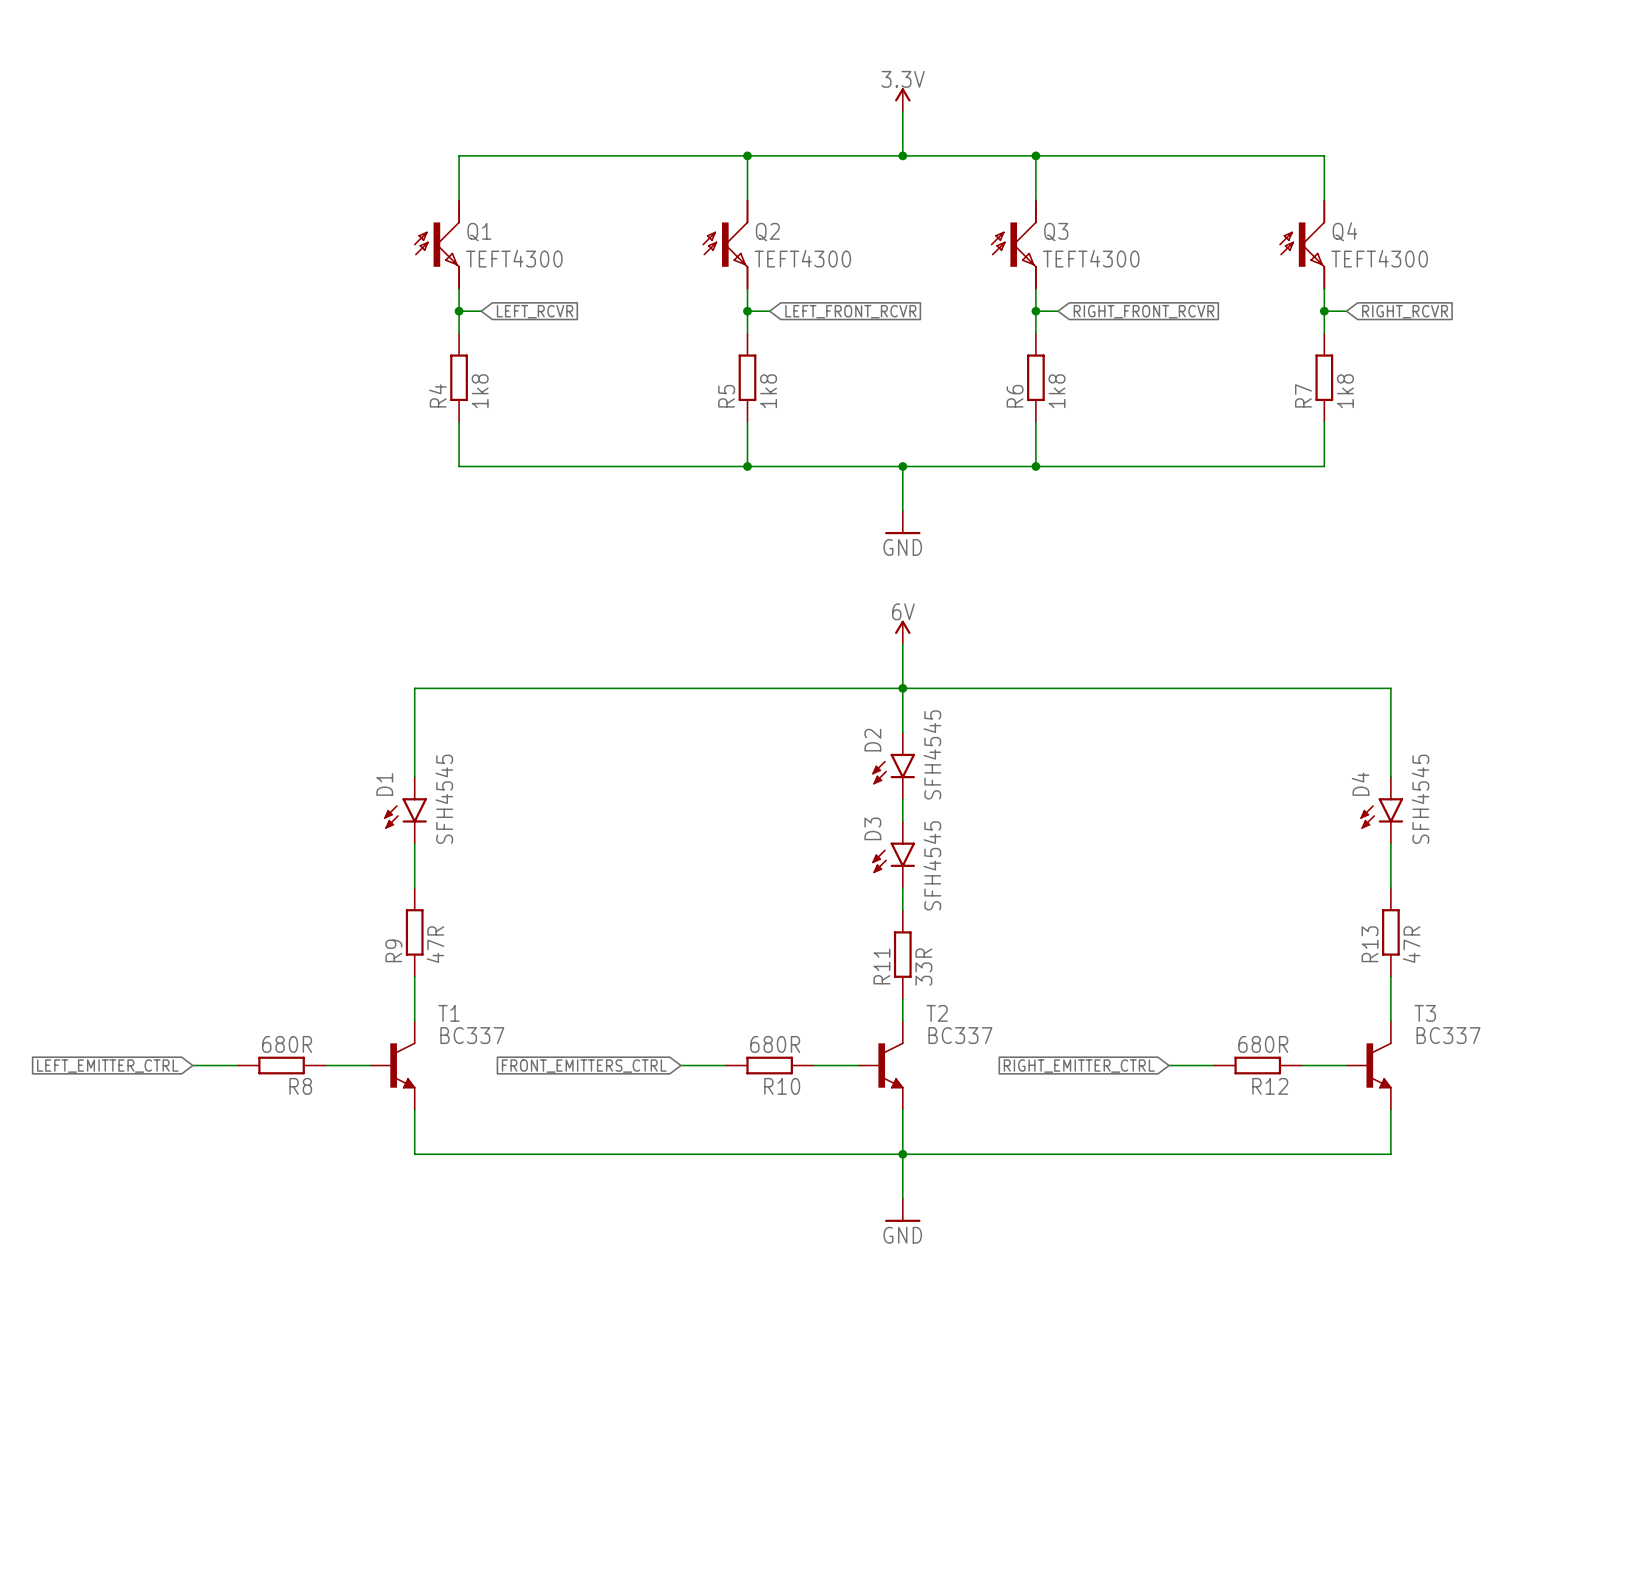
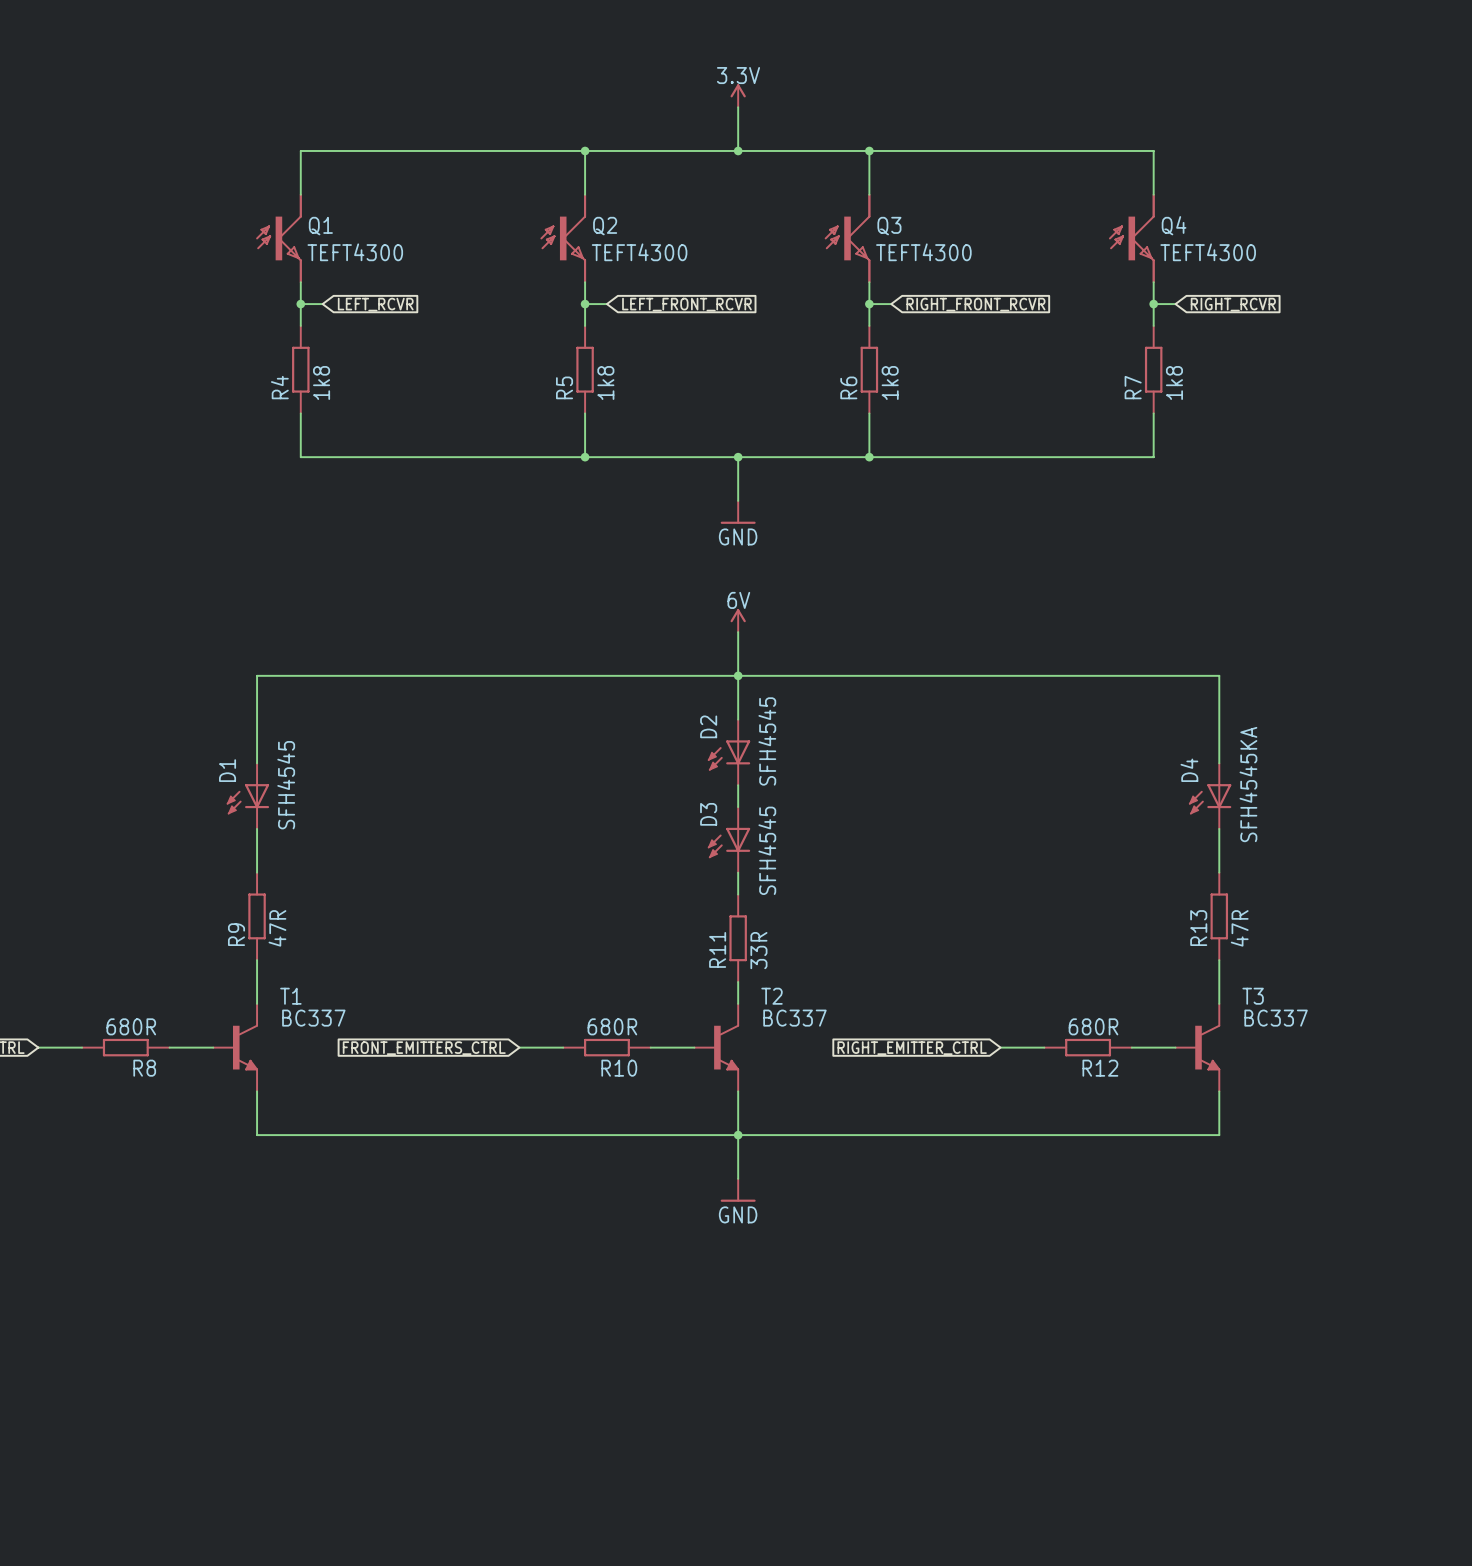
D2 symbol: [872, 732, 916, 800] -> [707, 719, 751, 786]
D1 symbol: [384, 777, 427, 844] -> [226, 763, 270, 829]
D4 symbol: [1360, 777, 1404, 844] -> [1189, 763, 1232, 829]
D4 value: SFH4545 (1420, 799) -> SFH4545KA (1248, 784)
D3 symbol: [872, 821, 916, 889] -> [707, 807, 751, 873]

